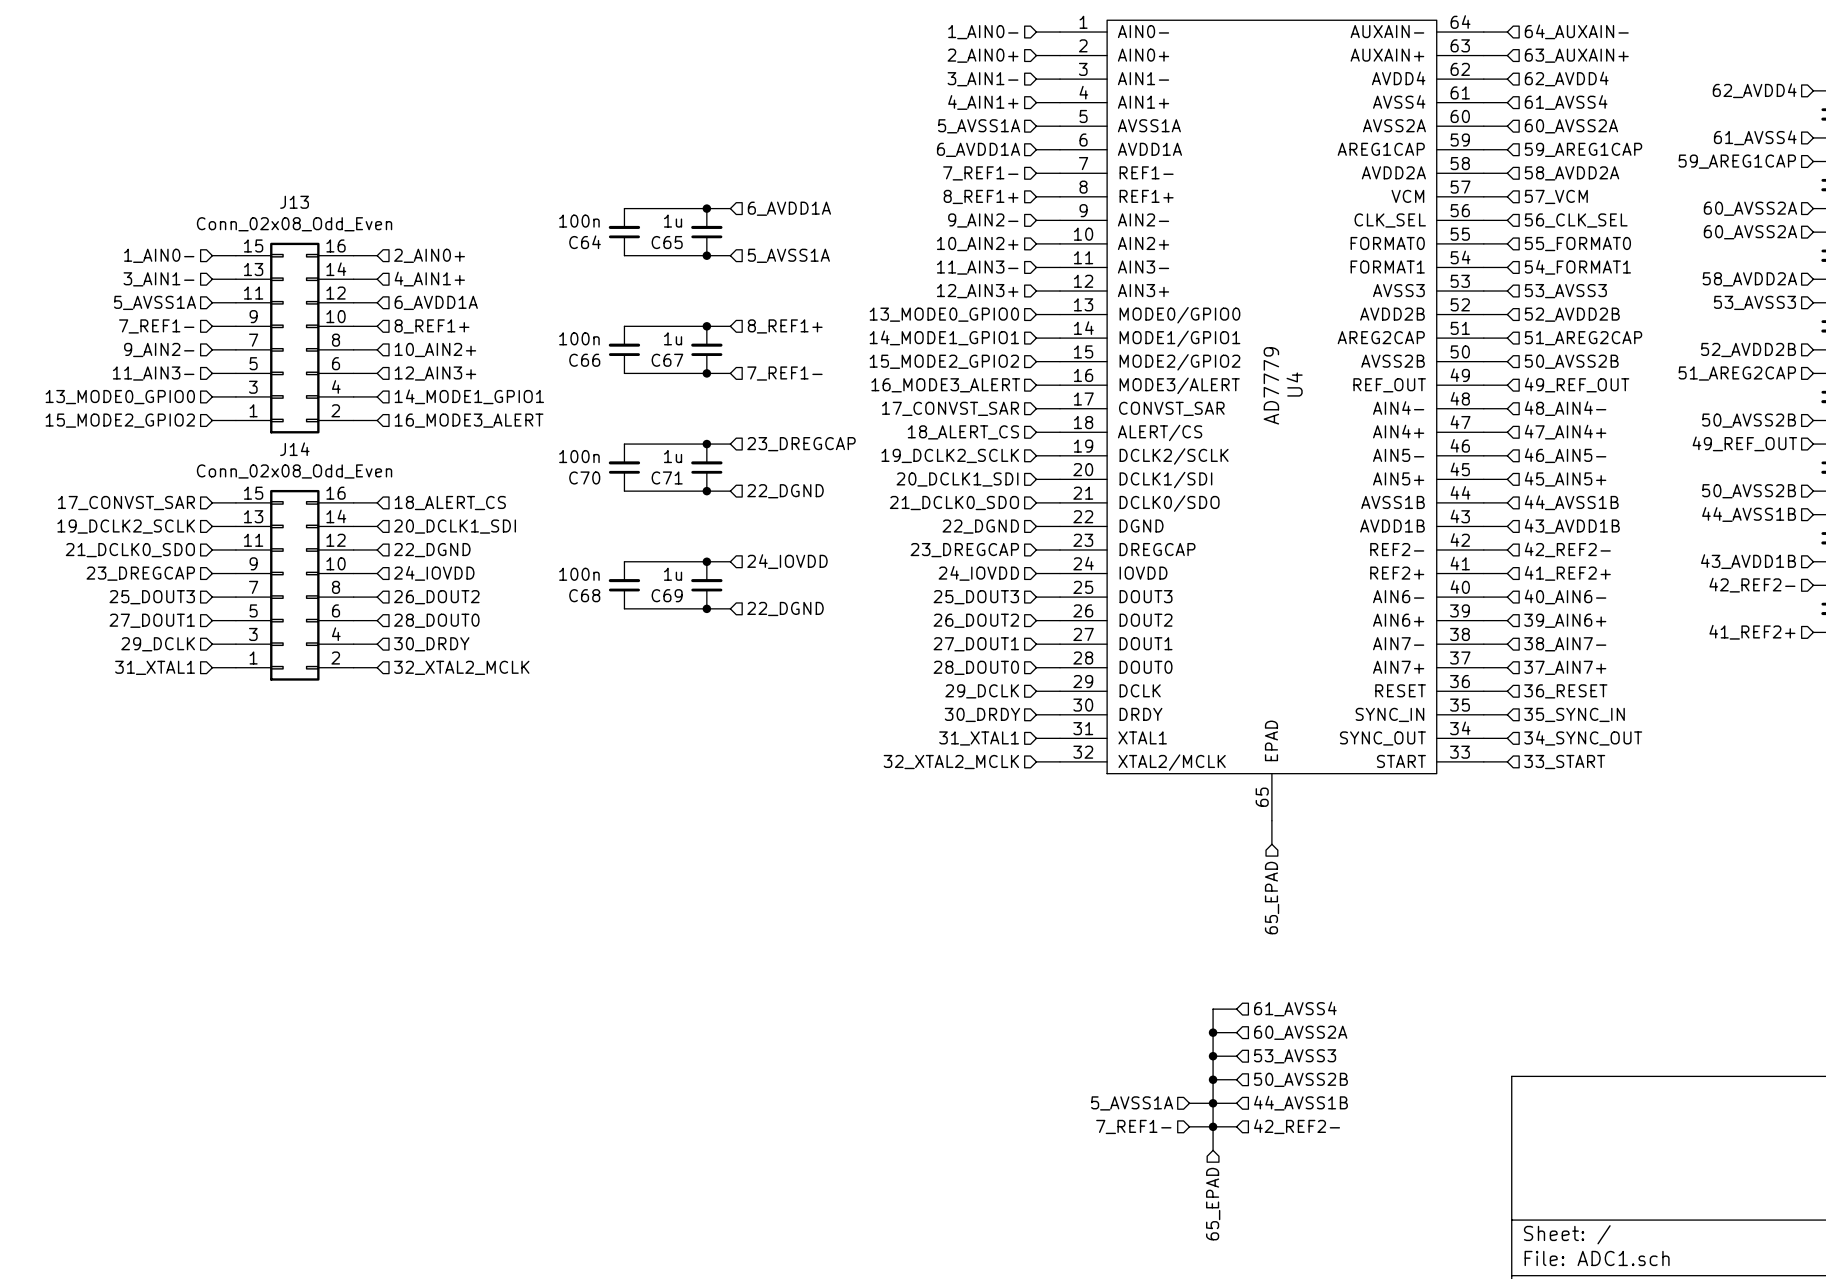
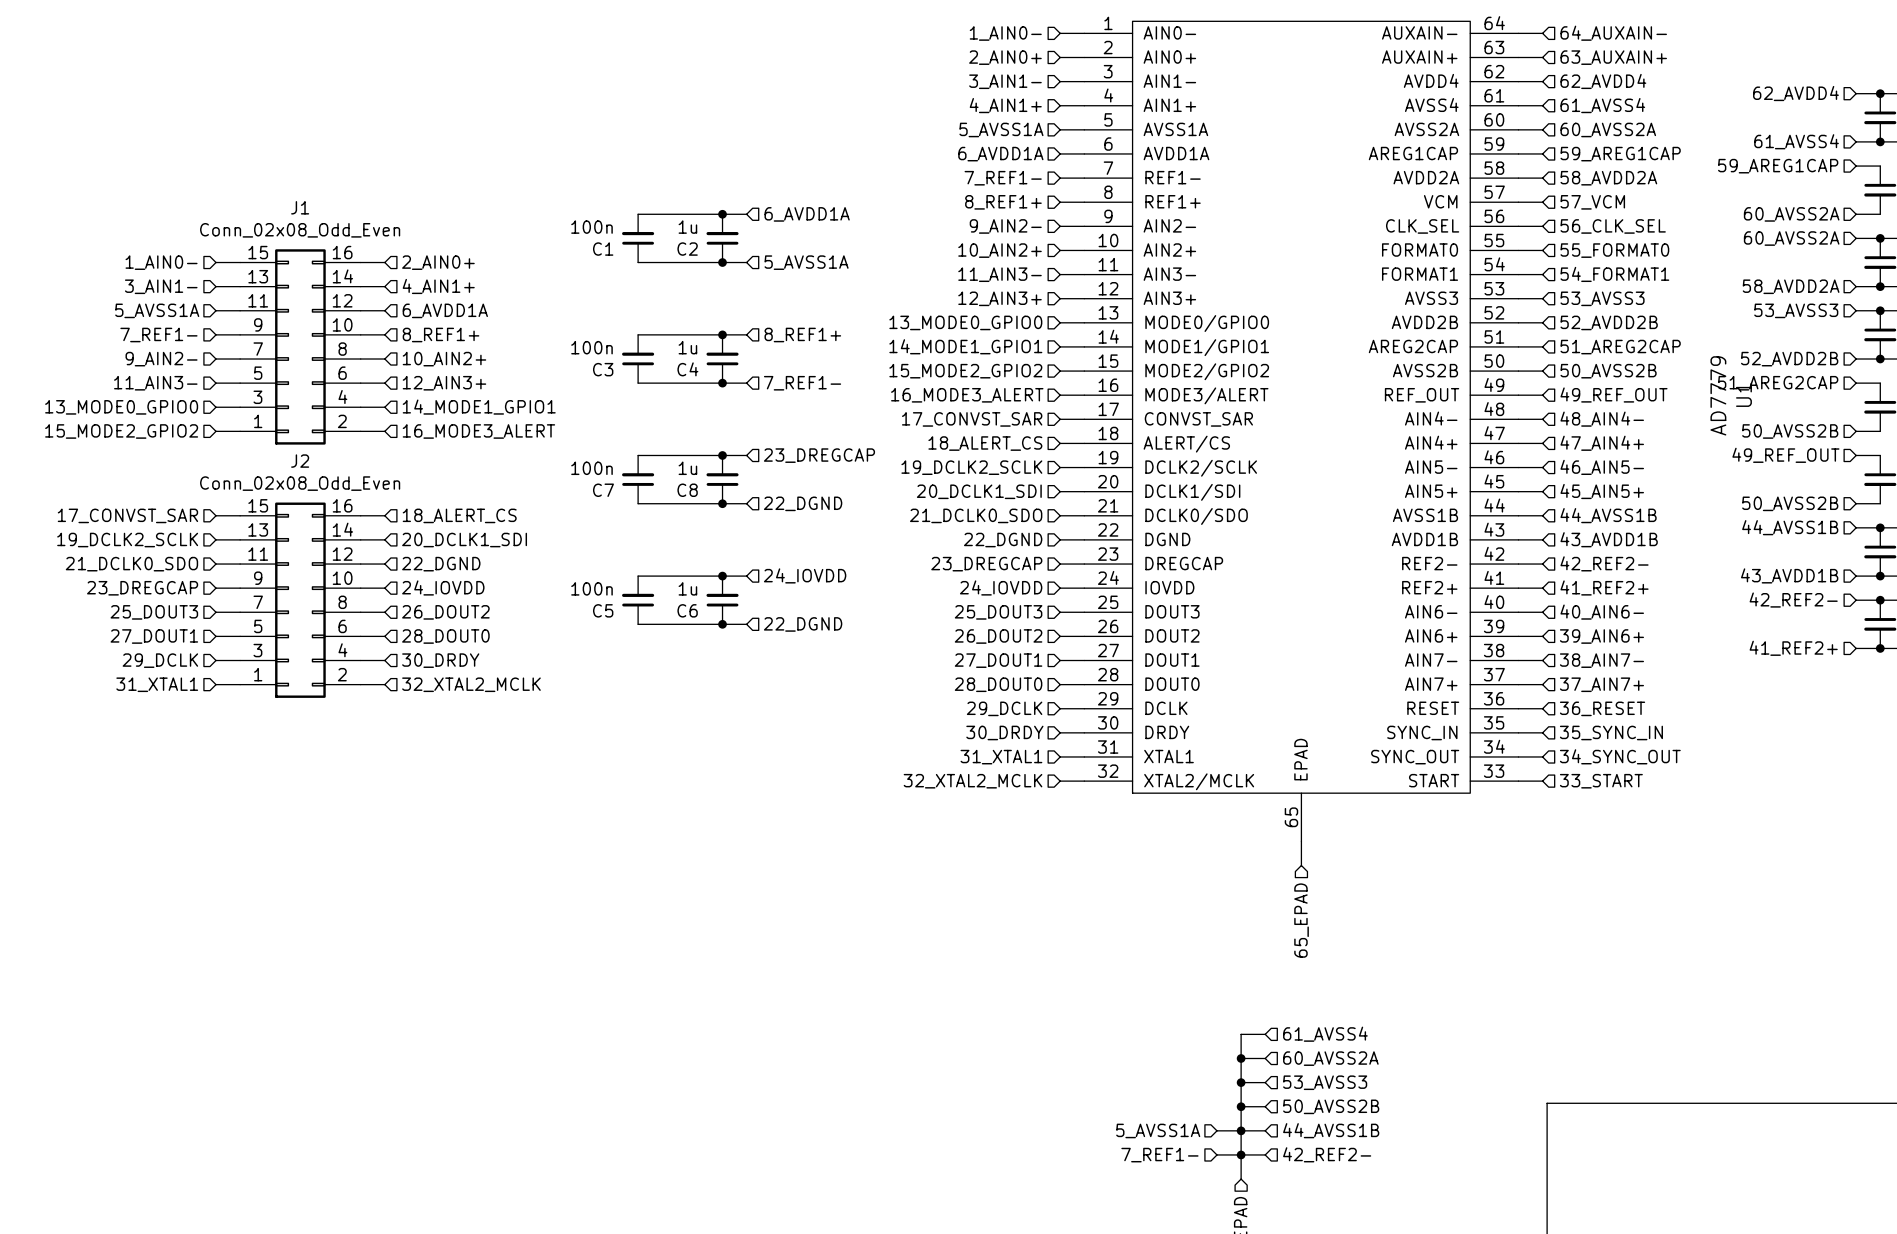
J13 name: J13 (294, 202) -> J1 (300, 207)
C64 name: C64 (585, 242) -> C1 (603, 249)
C65 name: C65 (667, 242) -> C2 (687, 249)
C66 name: C66 (584, 360) -> C3 (603, 369)
C67 name: C67 (667, 360) -> C4 (687, 369)
U4 name: U4 (1294, 384) -> U1 (1743, 394)
U4 value position: AD7779 (1271, 385) -> AD7779 (1718, 395)
J14 name: J14 (294, 449) -> J2 (300, 461)
C70 name: C70 (584, 477) -> C7 (603, 490)
C71 name: C71 (667, 477) -> C8 (687, 490)
C68 name: C68 (584, 595) -> C5 (603, 610)
C69 name: C69 (667, 595) -> C6 (687, 610)

